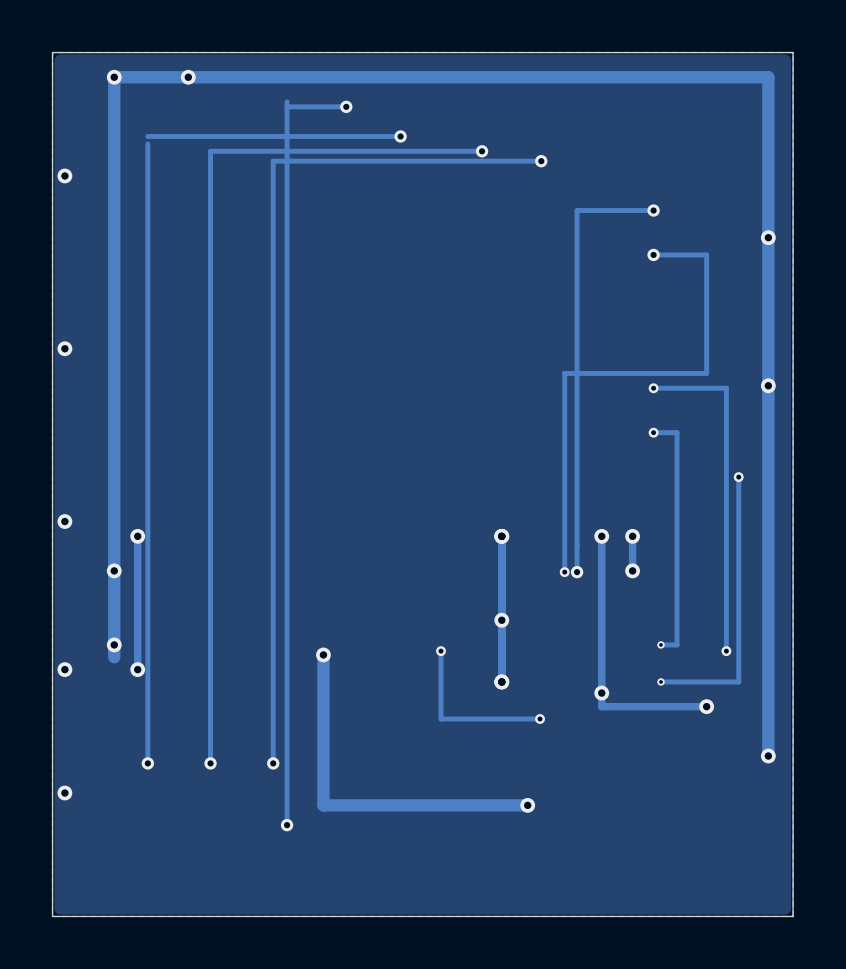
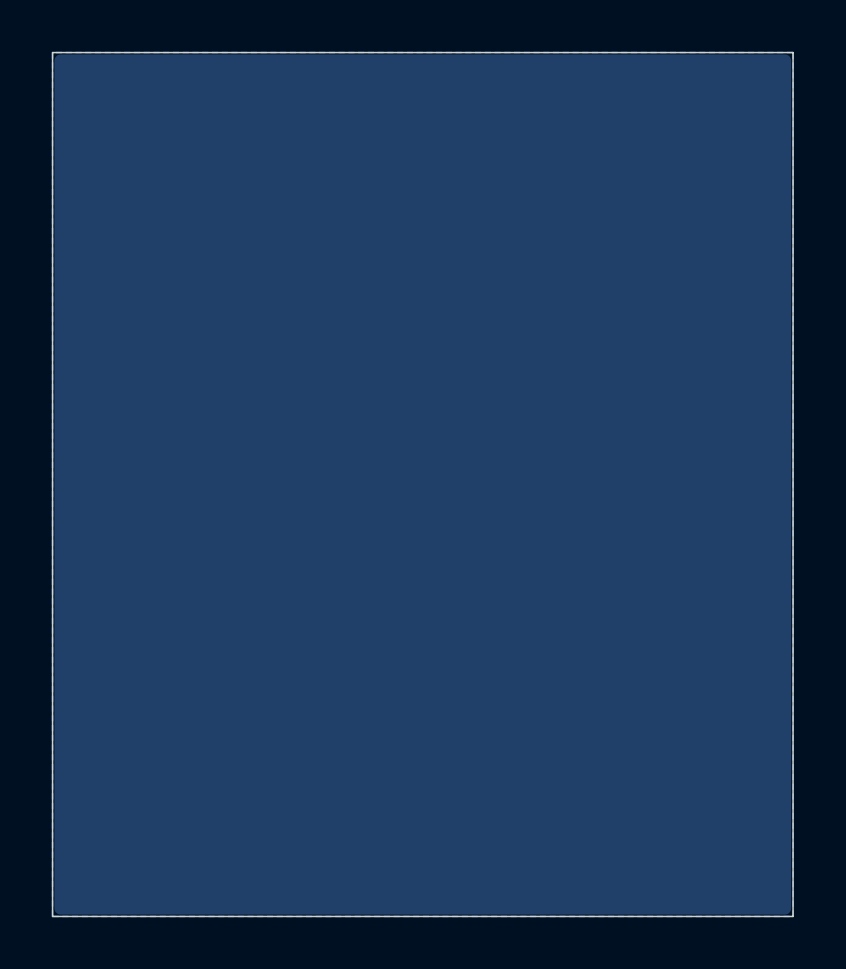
via: (114, 77) -> none
via: (188, 77) -> none
track: (287, 101) (287, 825) -> none
track: (346, 106) (287, 106) -> none
via: (346, 106) -> none
track: (400, 136) (147, 136) -> none
via: (400, 136) -> none
track: (147, 143) (147, 763) -> none
track: (482, 151) (210, 151) (210, 763) -> none
via: (482, 151) -> none
track: (541, 161) (273, 161) (273, 763) -> none
via: (541, 161) -> none
via: (64, 175) -> none
track: (653, 210) (577, 210) (577, 572) -> none
via: (653, 210) -> none
via: (768, 237) -> none
track: (653, 254) (706, 254) (706, 373) (564, 373) (564, 572) -> none
via: (653, 254) -> none
via: (64, 348) -> none
via: (768, 385) -> none
track: (653, 388) (726, 388) (726, 651) -> none
via: (653, 388) -> none
track: (653, 432) (677, 432) (677, 644) (660, 644) -> none
via: (653, 432) -> none
track: (738, 477) (738, 681) (660, 681) -> none
via: (738, 477) -> none
via: (64, 521) -> none
track: (137, 536) (137, 669) -> none
via: (137, 536) -> none
track: (501, 536) (501, 681) -> none
via: (501, 536) -> none
track: (601, 536) (601, 706) (706, 706) -> none
via: (601, 536) -> none
track: (632, 536) (632, 570) -> none
via: (632, 536) -> none
via: (114, 570) -> none
via: (632, 570) -> none
via: (564, 572) -> none
via: (577, 572) -> none
via: (501, 620) -> none
via: (114, 644) -> none
via: (660, 644) -> none
track: (441, 651) (441, 718) (540, 718) -> none
via: (441, 651) -> none
via: (726, 651) -> none
track: (323, 654) (323, 805) (527, 805) -> none
via: (323, 654) -> none
track: (114, 657) (114, 77) (768, 77) (768, 756) -> none
via: (64, 669) -> none
via: (137, 669) -> none
via: (501, 681) -> none
via: (660, 681) -> none
via: (601, 693) -> none
via: (706, 706) -> none
via: (540, 718) -> none
via: (768, 756) -> none
via: (147, 763) -> none
via: (210, 763) -> none
via: (273, 763) -> none
via: (64, 793) -> none
via: (527, 805) -> none
via: (287, 825) -> none

